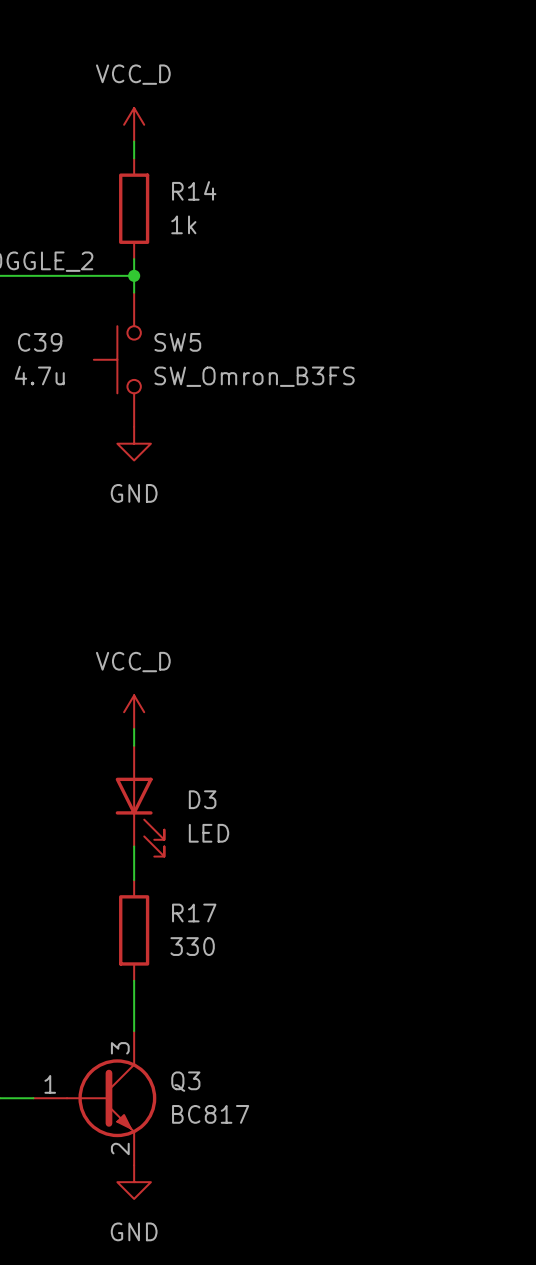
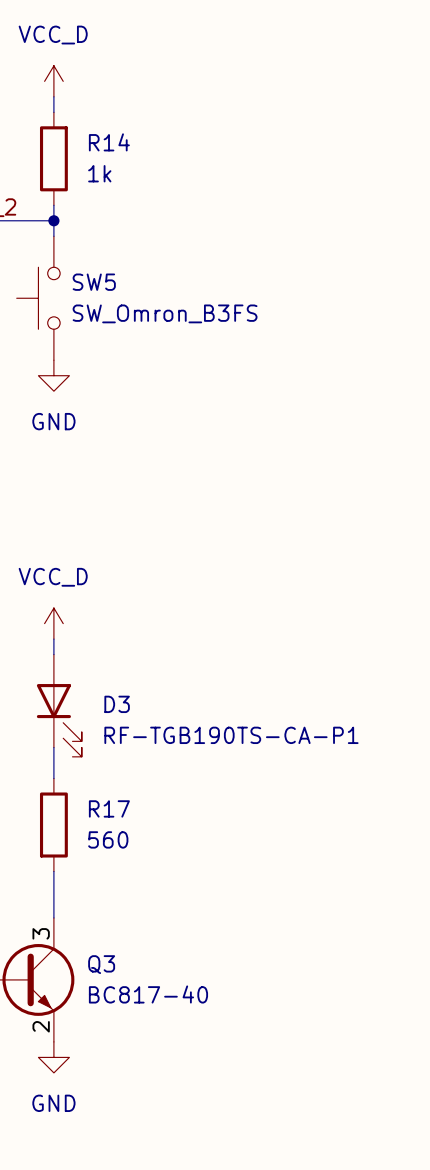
D3 value: LED (209, 833) -> RF-TGB190TS-CA-P1 (231, 735)
R17 value: 330 (192, 946) -> 560 (108, 839)
Q3 value: BC817 (210, 1114) -> BC817-40 (148, 994)

